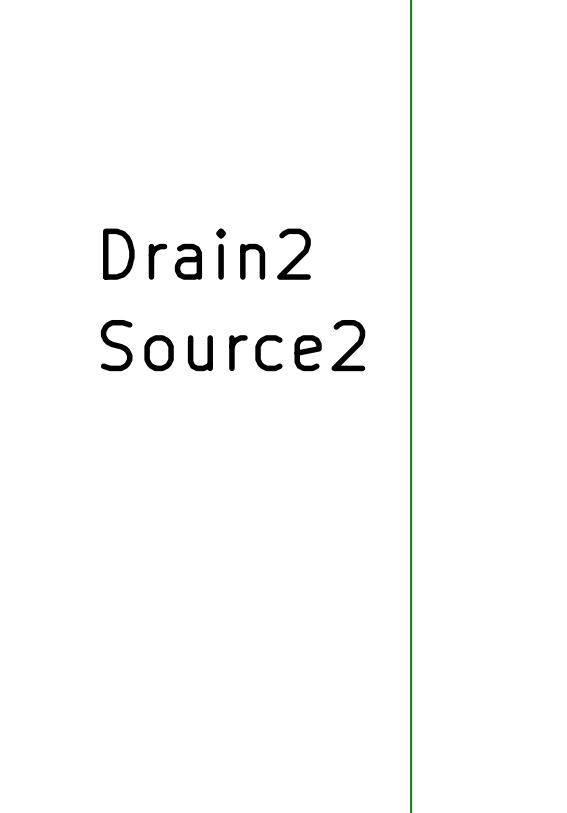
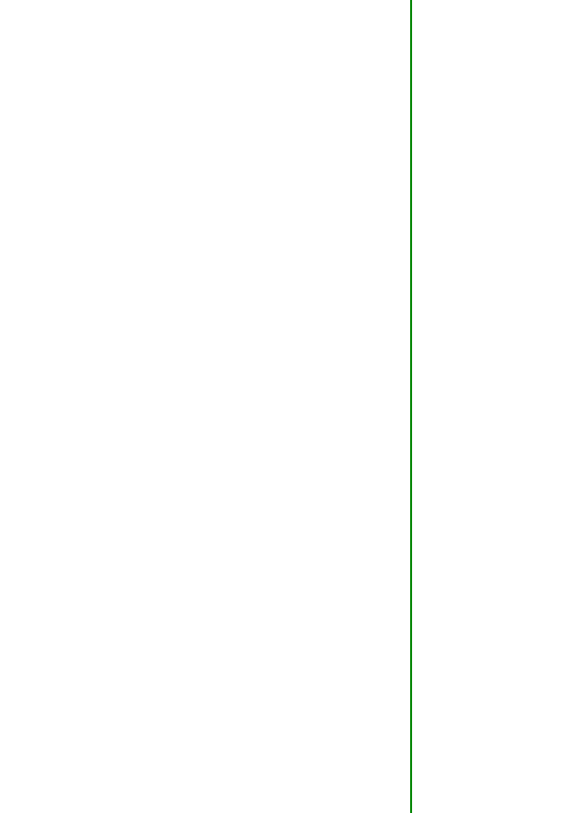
label: Drain2 (206, 254) -> none
label: Source2 (233, 345) -> none

